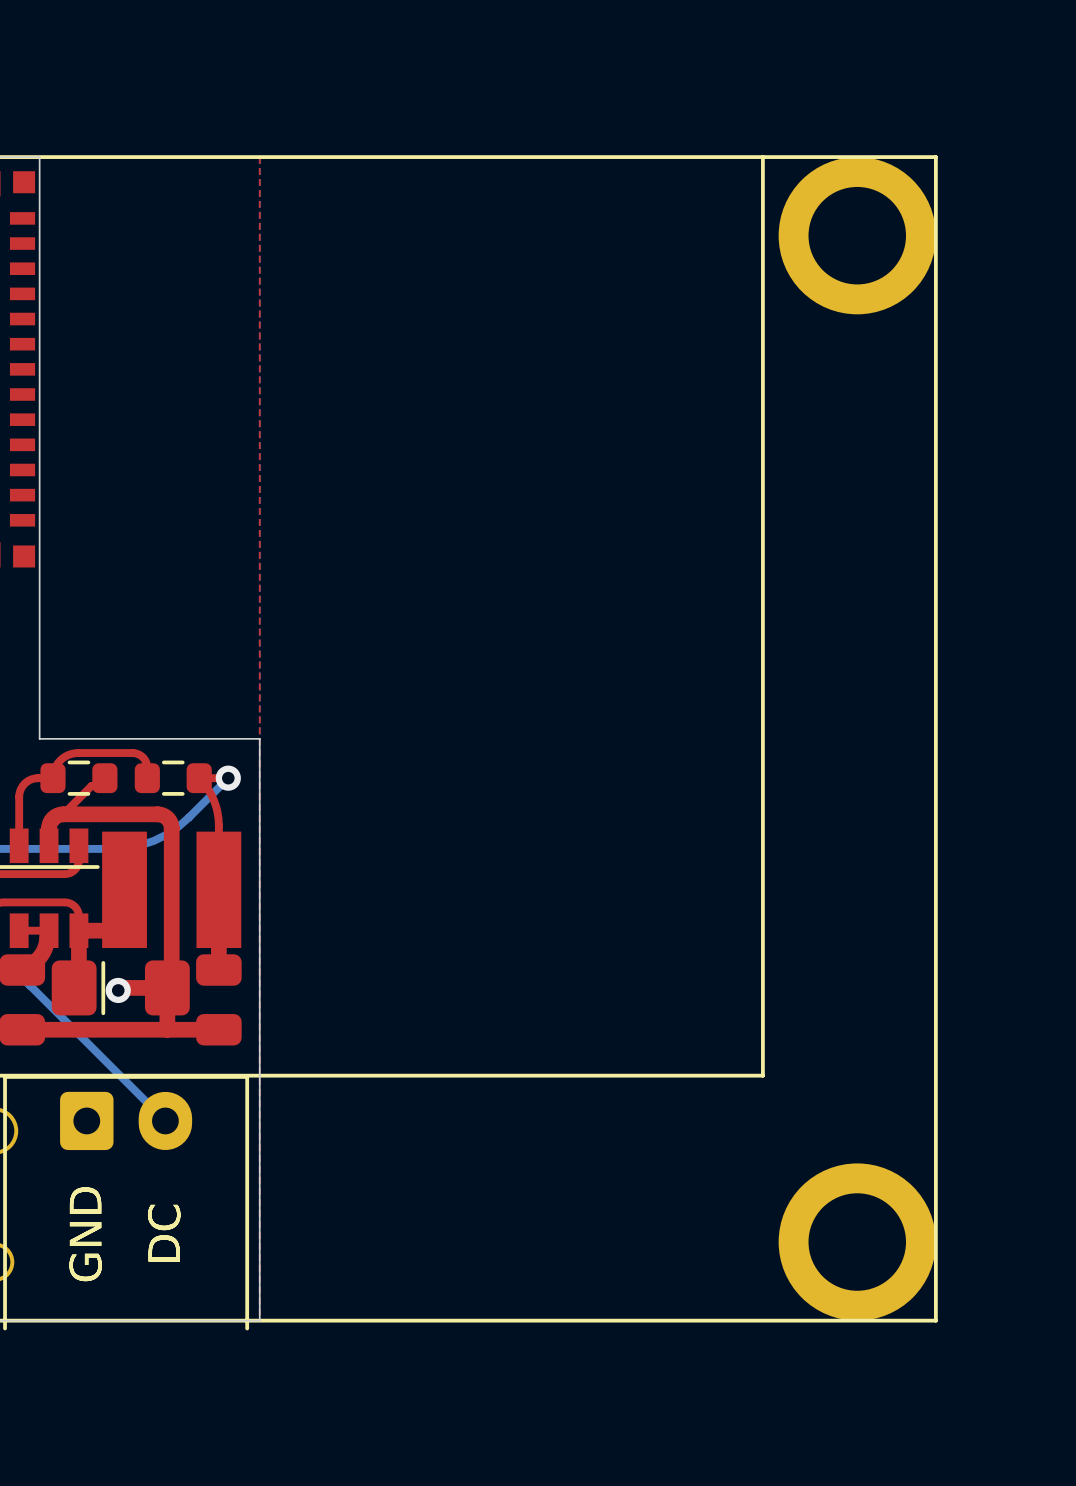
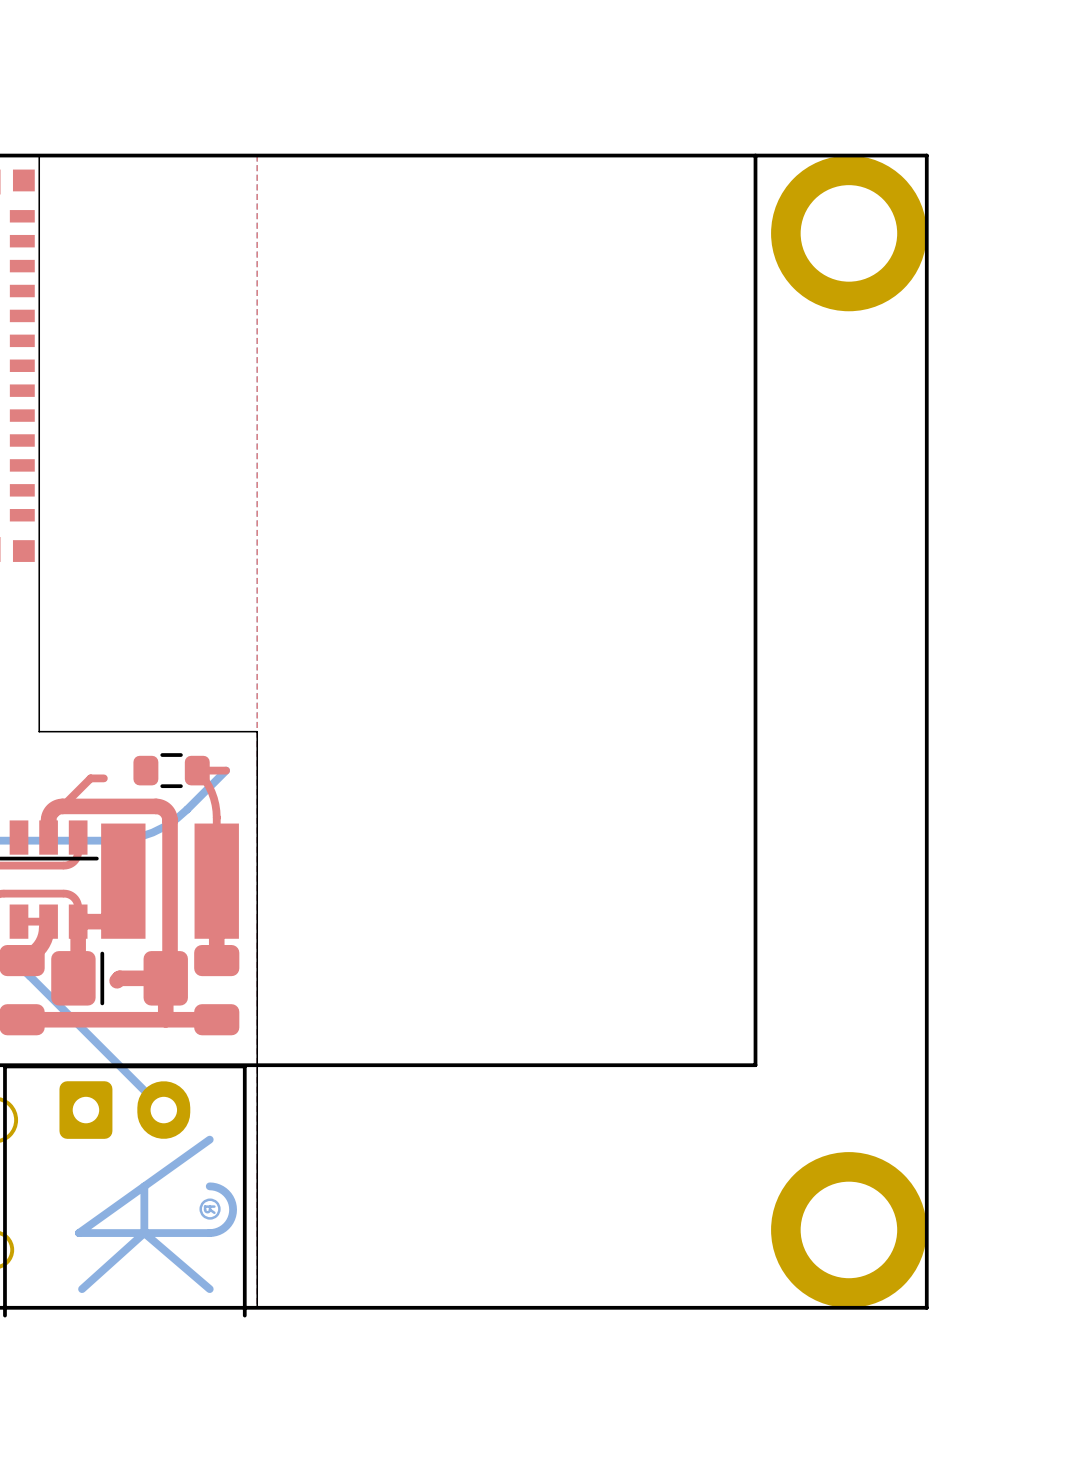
part: (78, 778) -> none
top track: (147, 778) (146, 762) (142, 757) (136, 753) (78, 753) (65, 756) (56, 765) (52, 778) (33, 778) (21, 787) (19, 797) (19, 845) -> none
via: (228, 778) -> none
via: (118, 990) -> none
drawing: none -> [75, 1135, 237, 1294]
text: DC (164, 1233) -> none
text: GND (85, 1234) -> none

